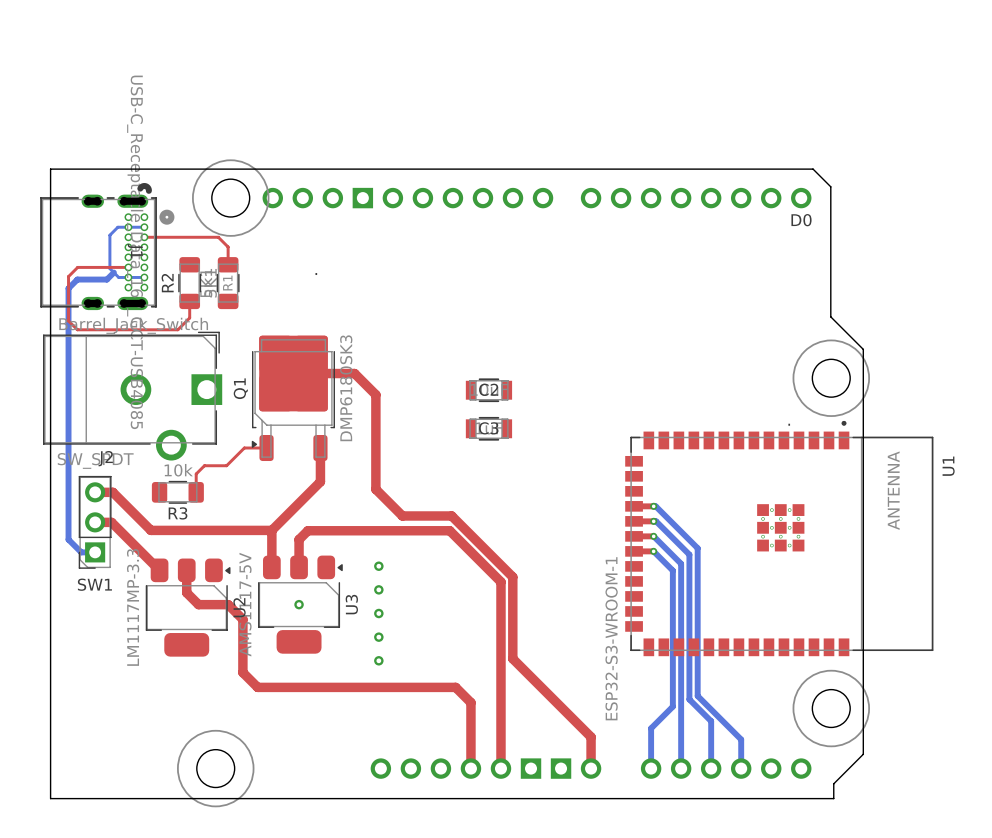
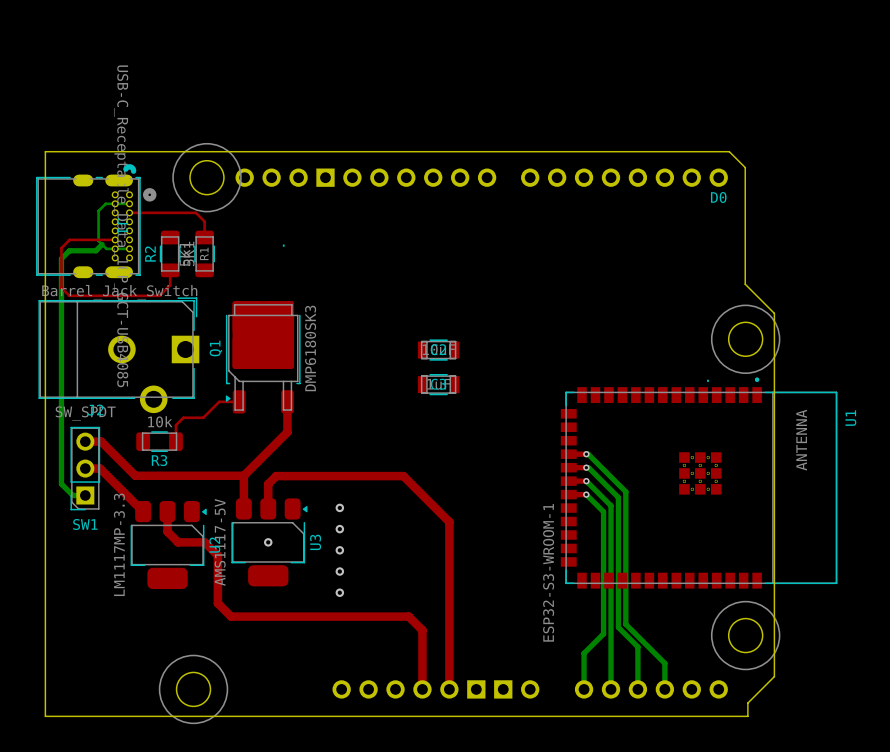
top track: (293, 373) (354, 373) (375, 394) (375, 489) (402, 515) (451, 515) (512, 577) (512, 658) (591, 737) (591, 768) -> none

